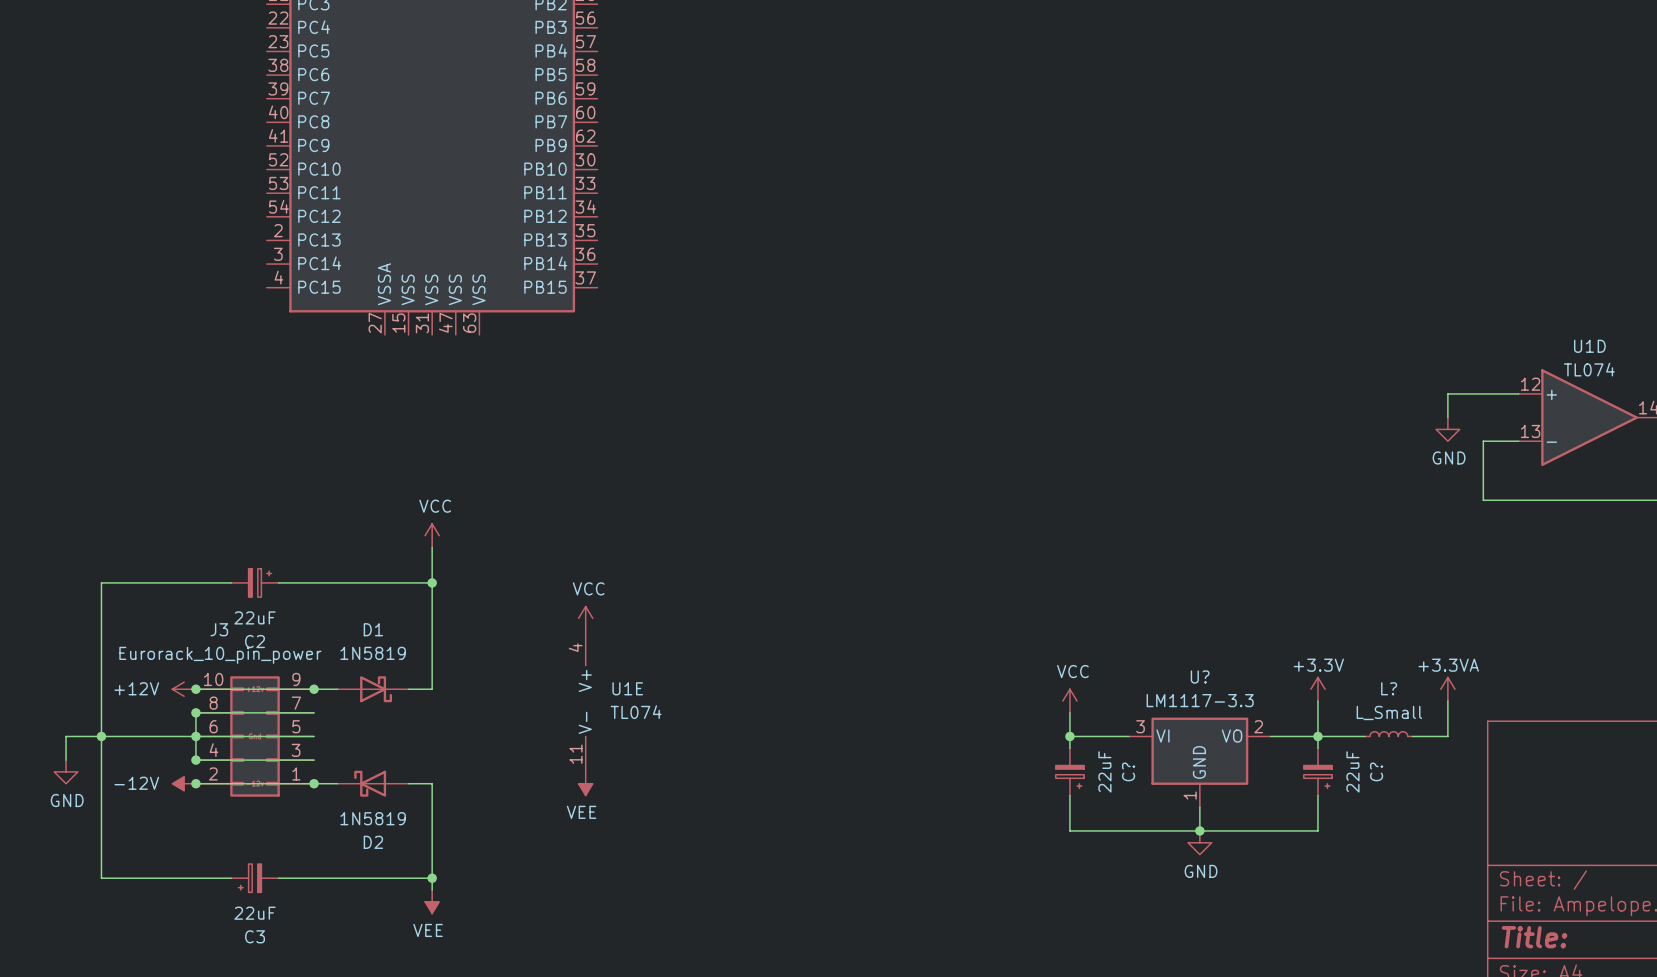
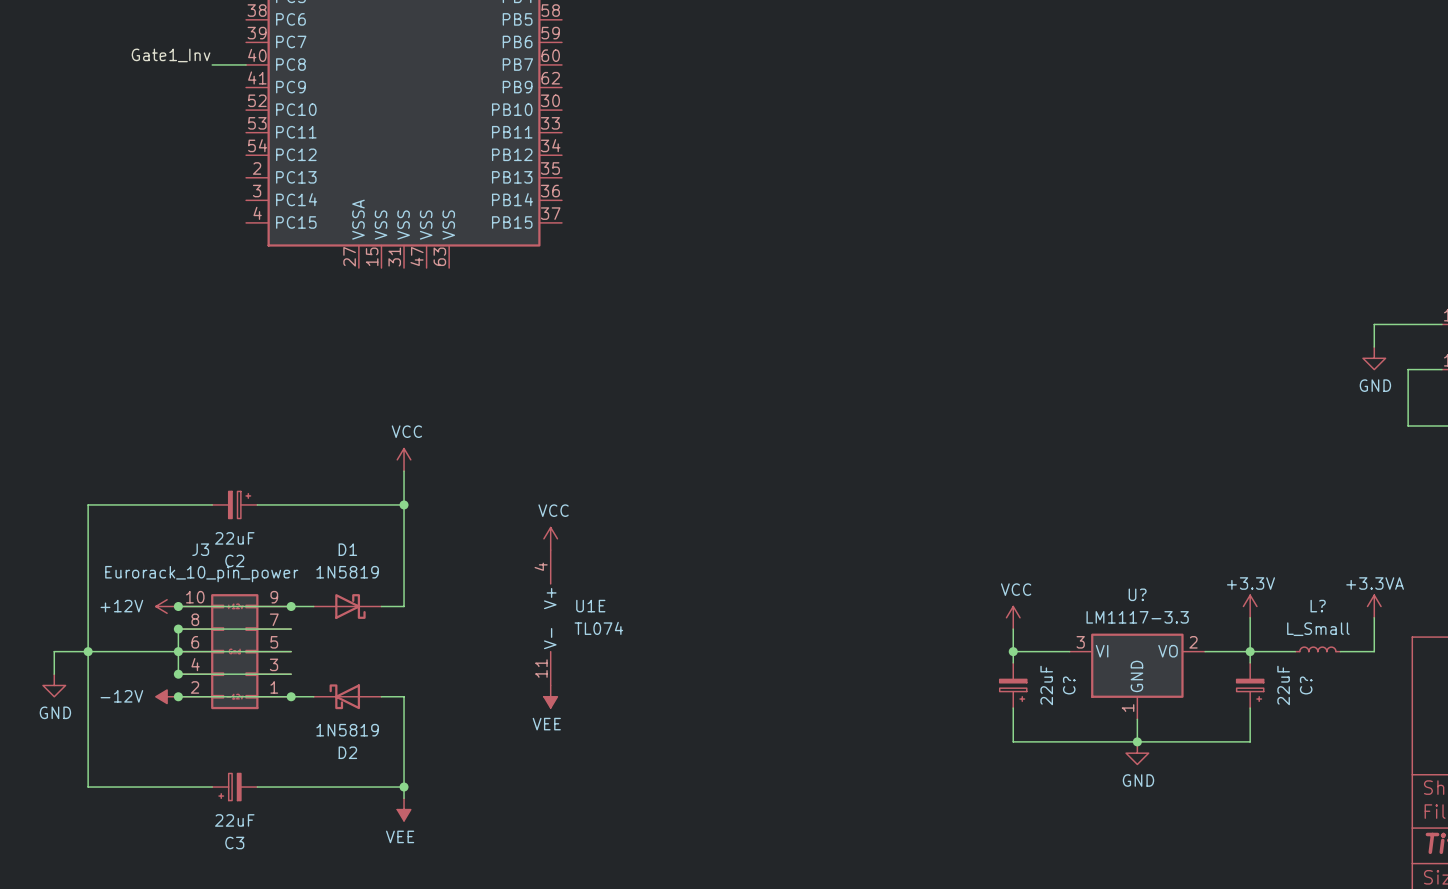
label: none -> Gate1_Inv (171, 55)
wire: none -> (212, 64) (246, 64)

